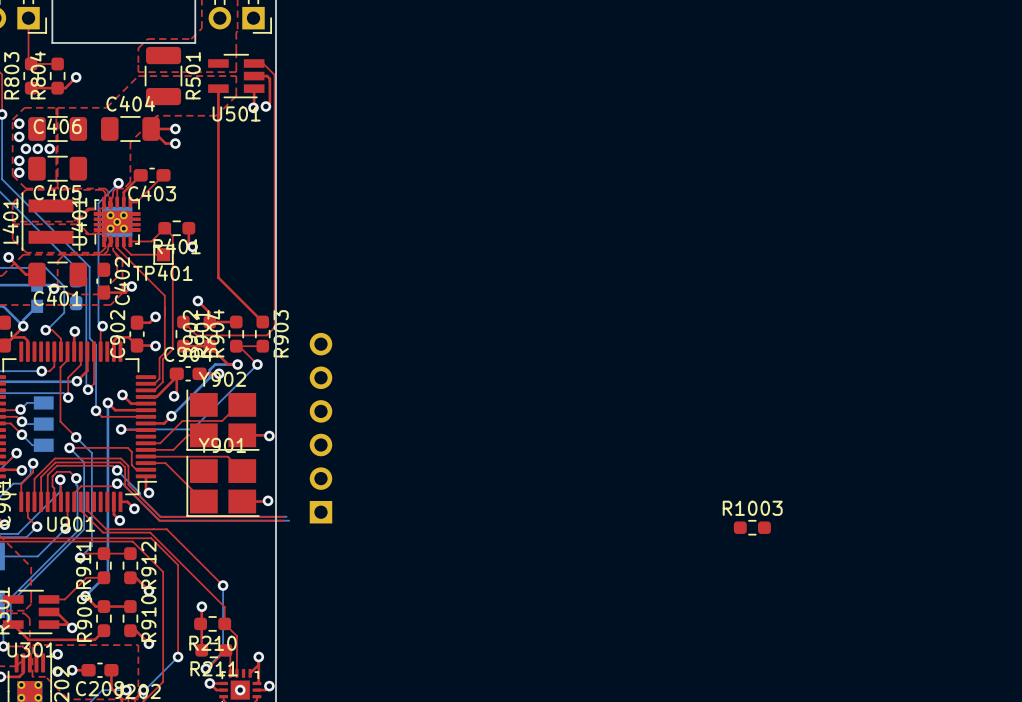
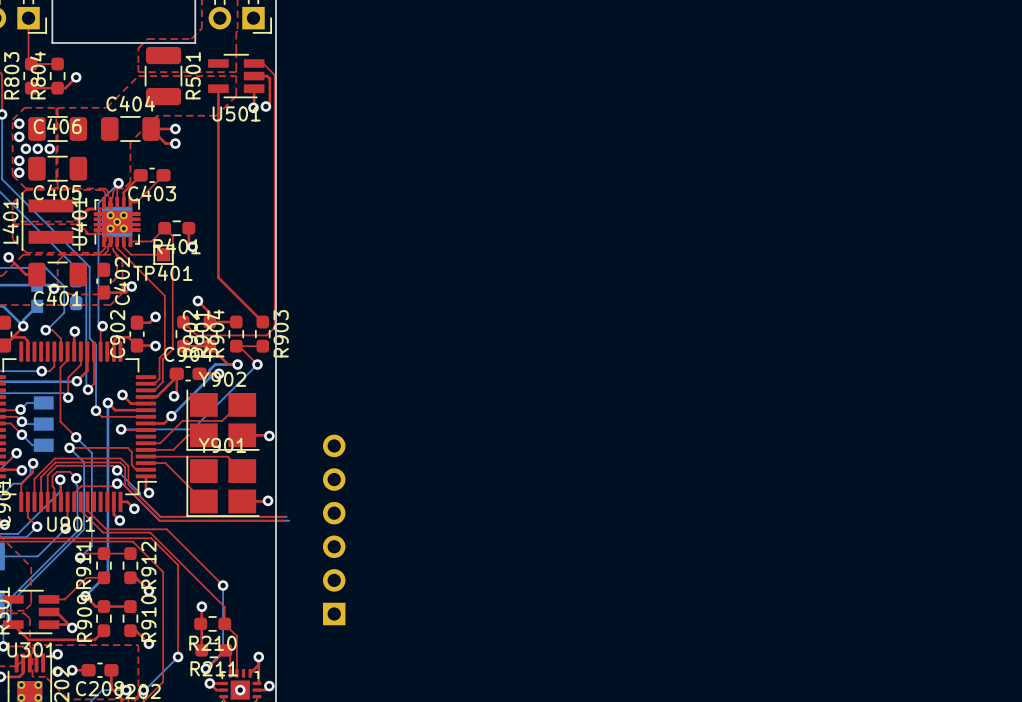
part position: (320, 428) -> (334, 529)
R1003: (752, 527) -> none

